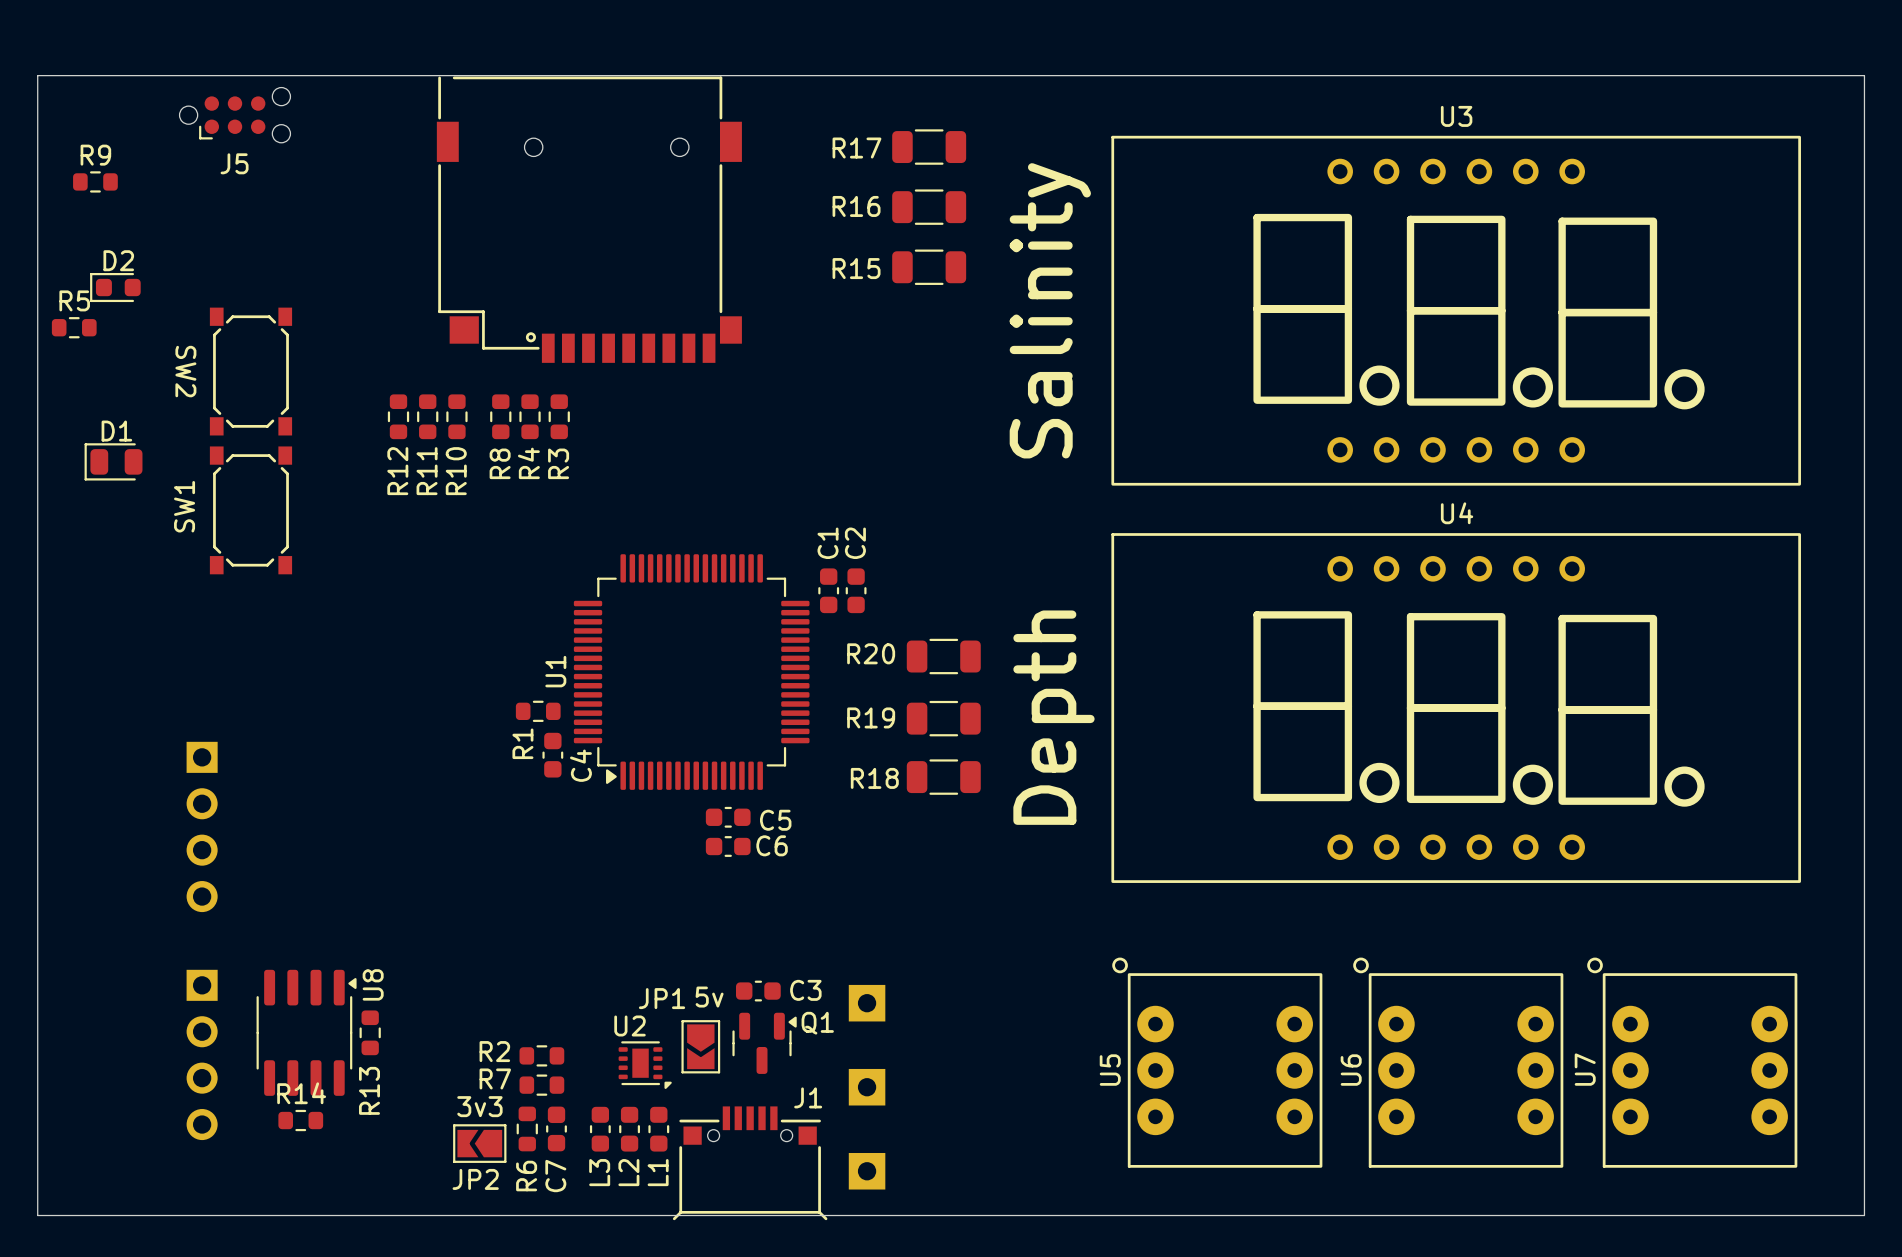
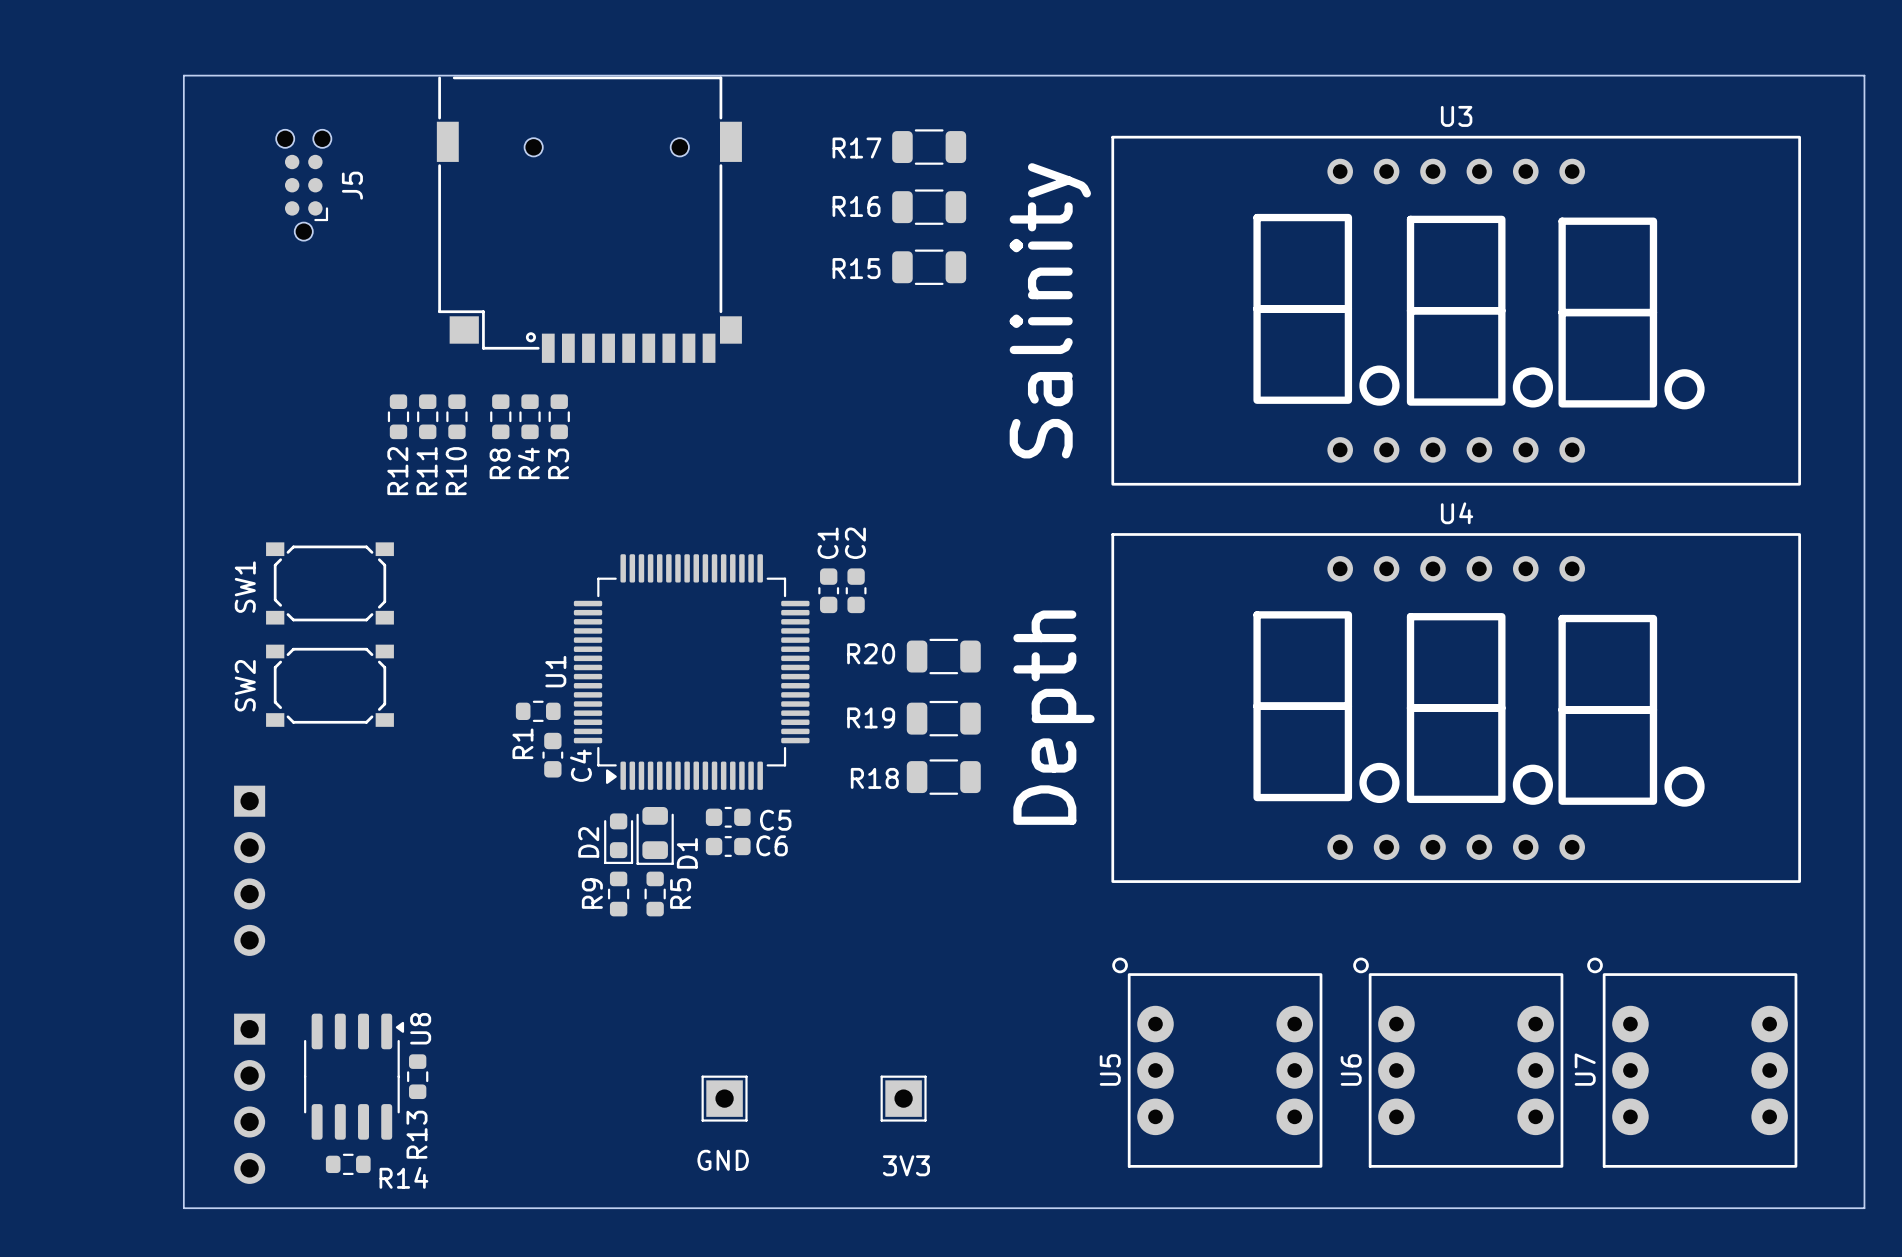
board edge: (183, 75) (37, 75) (37, 1215) (1864, 1215) (1864, 1208) -> (183, 75) (183, 1208) (1864, 1208)
J5 rotation: 0° (235, 115) -> 90° counterclockwise (303, 185)
J5 position: (235, 115) -> (303, 185)
R9 rotation: 0° (95, 181) -> 90° clockwise (618, 894)
R9 position: (95, 181) -> (618, 894)
D2 rotation: 0° (115, 287) -> 90° counterclockwise (618, 838)
D2 position: (115, 287) -> (618, 838)
R5 rotation: 0° (74, 327) -> 90° clockwise (655, 894)
R5 position: (74, 327) -> (655, 894)
SW2 rotation: 0° (250, 371) -> 90° clockwise (329, 685)
SW2 position: (250, 371) -> (329, 685)
D1 name position: D1 (116, 431) -> D1 (687, 853)
D1 rotation: 0° (113, 461) -> 90° counterclockwise (655, 835)
D1 position: (113, 461) -> (655, 835)
SW1 rotation: 0° (250, 510) -> 90° clockwise (329, 583)
SW1 position: (250, 510) -> (329, 583)
part position: (202, 826) -> (249, 870)
C3: (758, 991) -> none
text: 5v (709, 997) -> none
part side: bottom (867, 1003) -> top (903, 1098)
U8 position: (306, 1032) -> (354, 1076)
R13 position: (370, 1032) -> (417, 1076)
Q1: (764, 1043) -> none
JP1: (700, 1046) -> none
part position: (202, 1054) -> (249, 1098)
R2: (541, 1055) -> none
U2: (645, 1065) -> none
R7: (541, 1085) -> none
part: (867, 1087) -> none
R14 name position: R14 (301, 1093) -> R14 (403, 1177)
text: 3v3 (479, 1106) -> none
R14 position: (300, 1120) -> (348, 1164)
R6: (527, 1128) -> none
C7: (556, 1128) -> none
L3: (600, 1129) -> none
L2: (629, 1129) -> none
L1: (658, 1129) -> none
JP2: (479, 1143) -> none
text: none -> GND (723, 1160)
J1: (750, 1163) -> none
text: none -> 3V3 (906, 1165)
part side: bottom (867, 1171) -> top (724, 1098)

